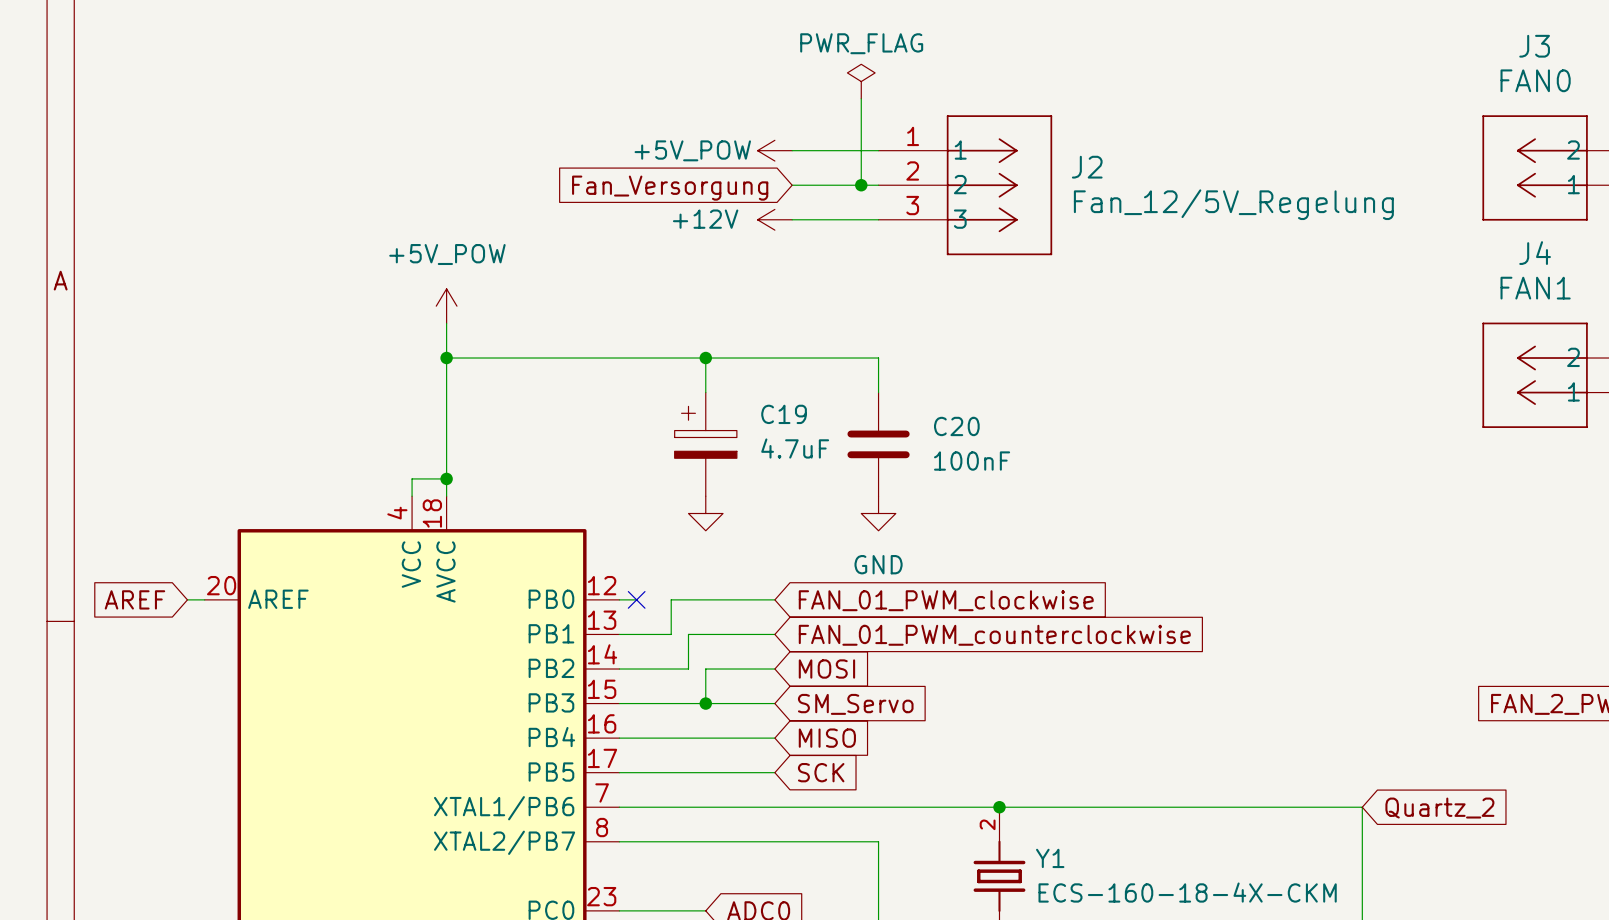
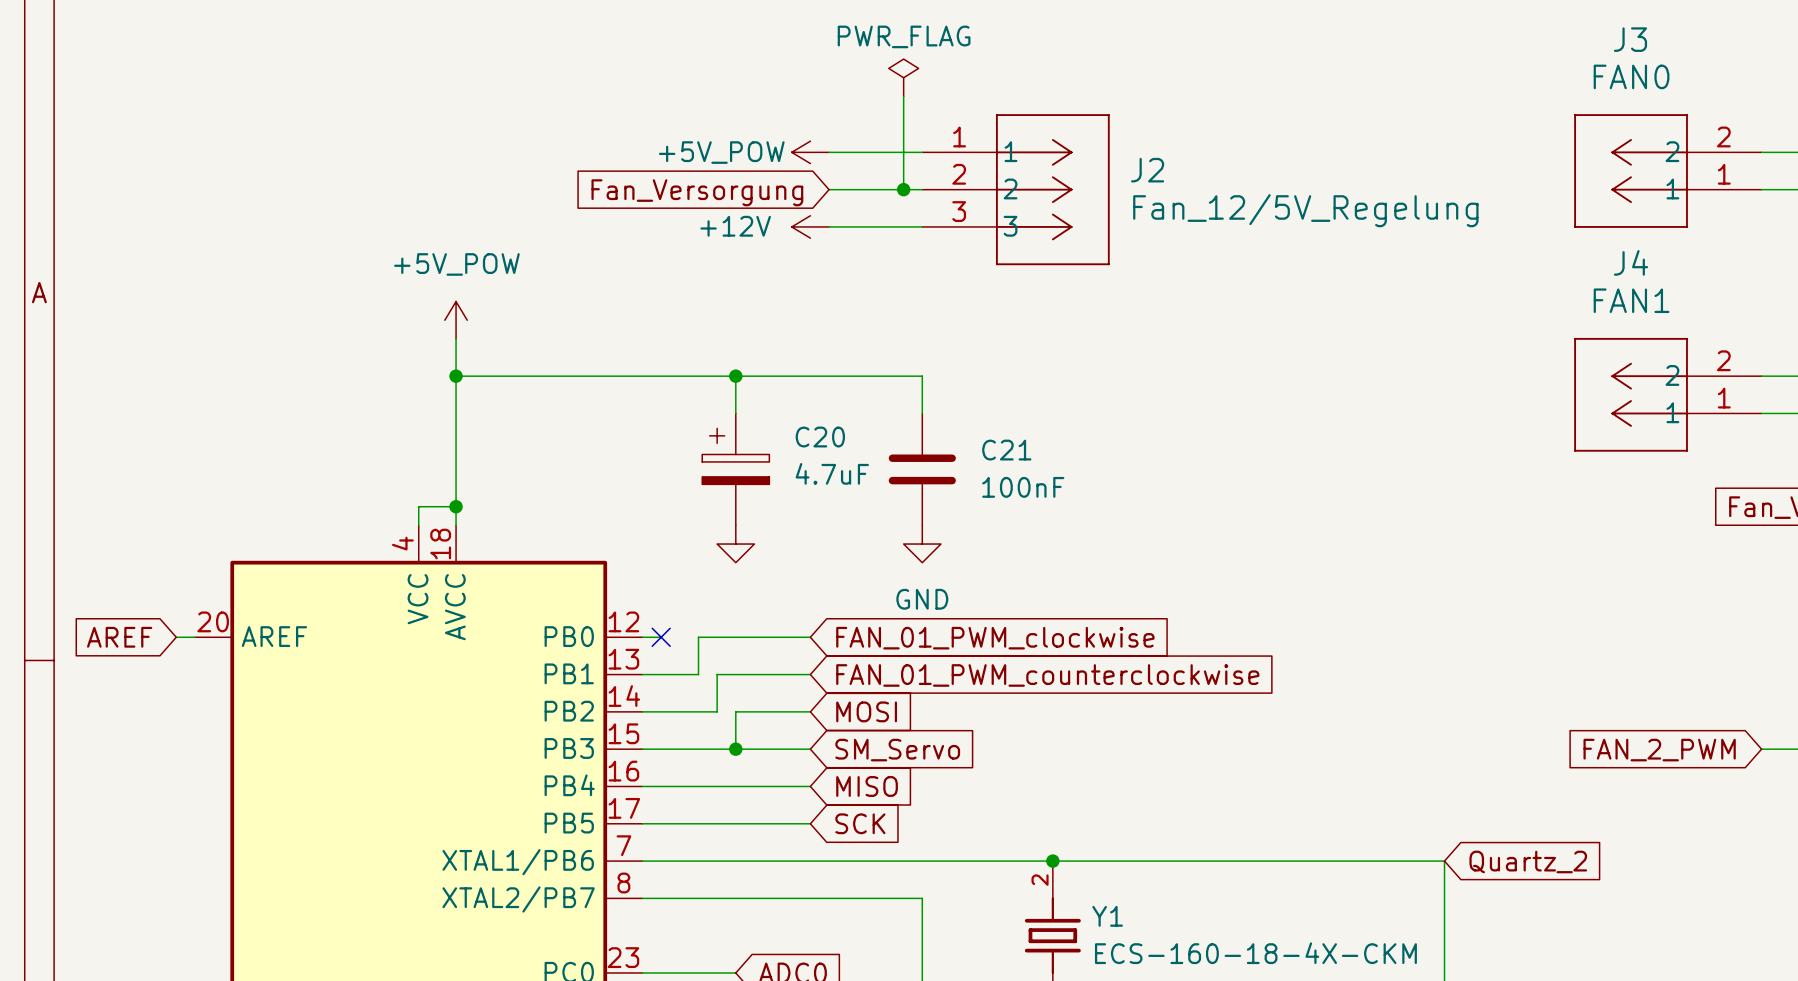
C19 name: C19 (784, 414) -> C20 (820, 437)
C20 name: C20 (956, 426) -> C21 (1006, 450)

